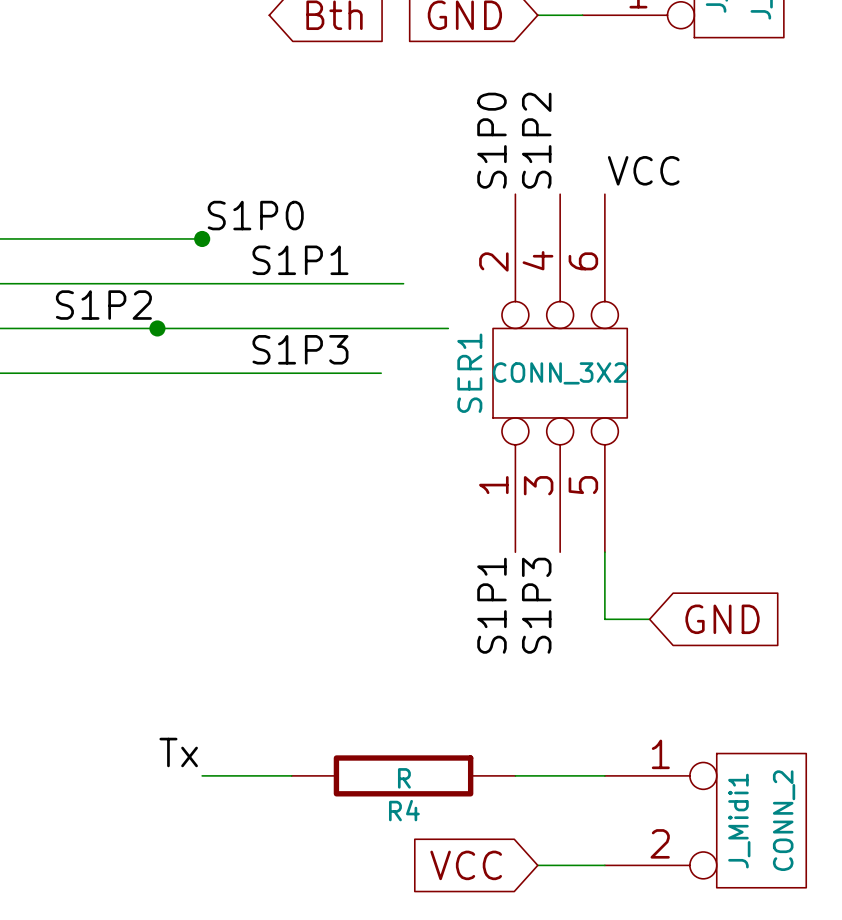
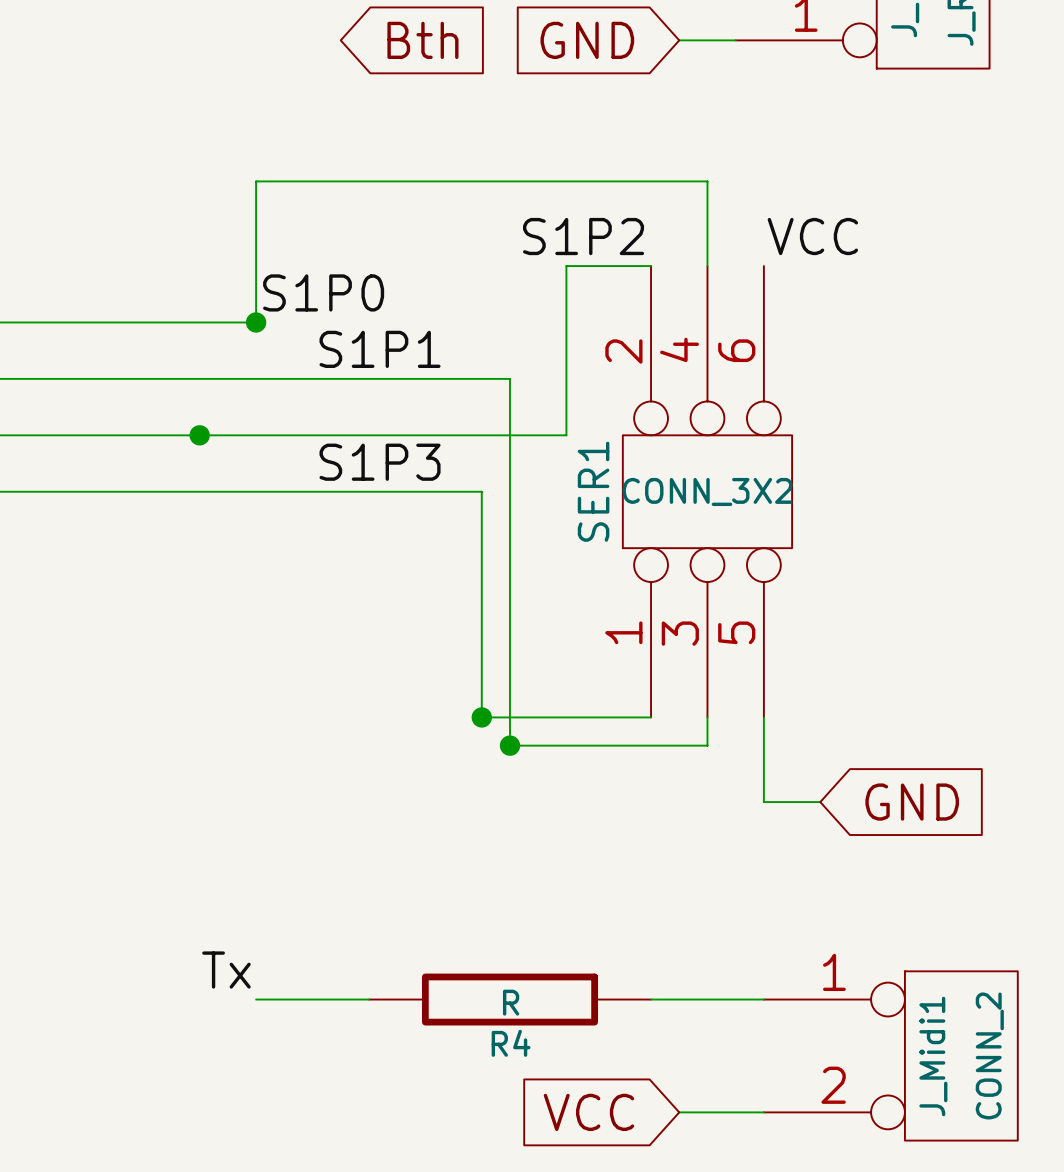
label: S1P0 (491, 140) -> S1P2 (583, 236)
label: S1P2 (536, 140) -> none
wire: none -> (651, 266) (566, 266) (566, 435)
wire: none -> (707, 266) (707, 181) (256, 181) (256, 322)
wire: none -> (509, 378) (509, 745) (707, 745) (707, 717)
label: S1P2 (103, 305) -> none
wire: none -> (481, 491) (481, 717) (651, 717)
junction: none -> (481, 717)
junction: none -> (509, 745)
label: S1P1 (491, 605) -> none
label: S1P3 (536, 605) -> none

